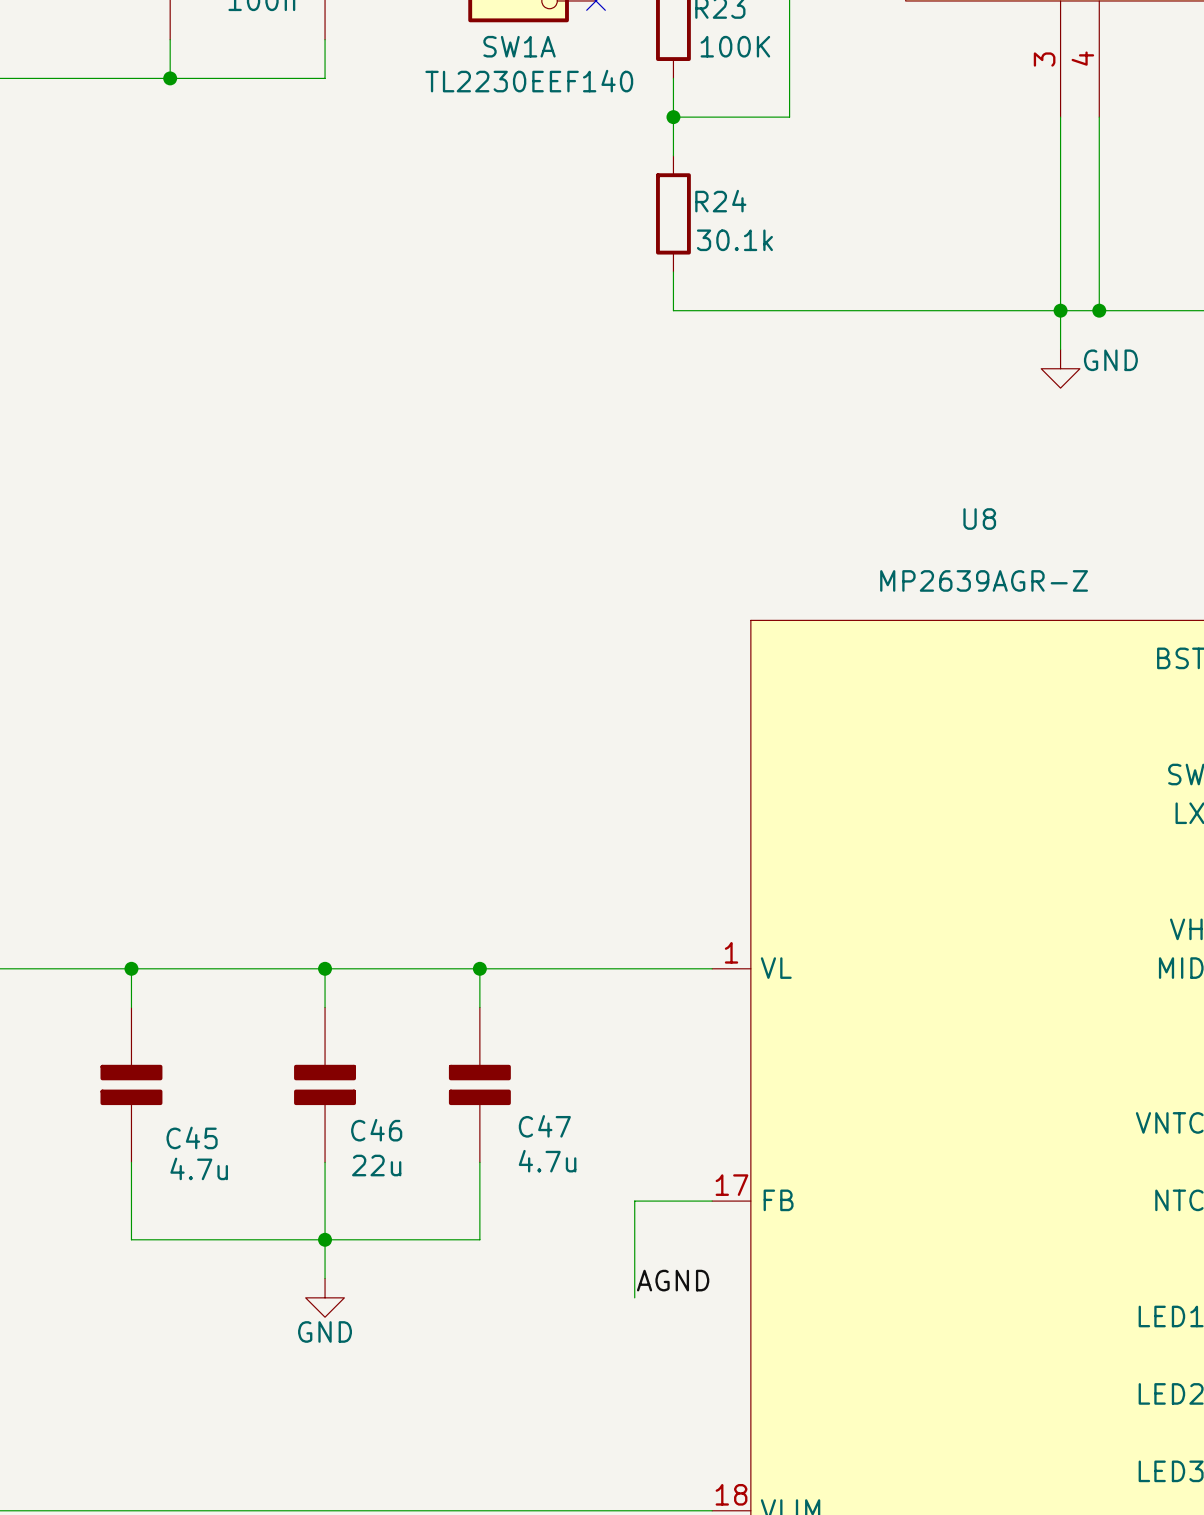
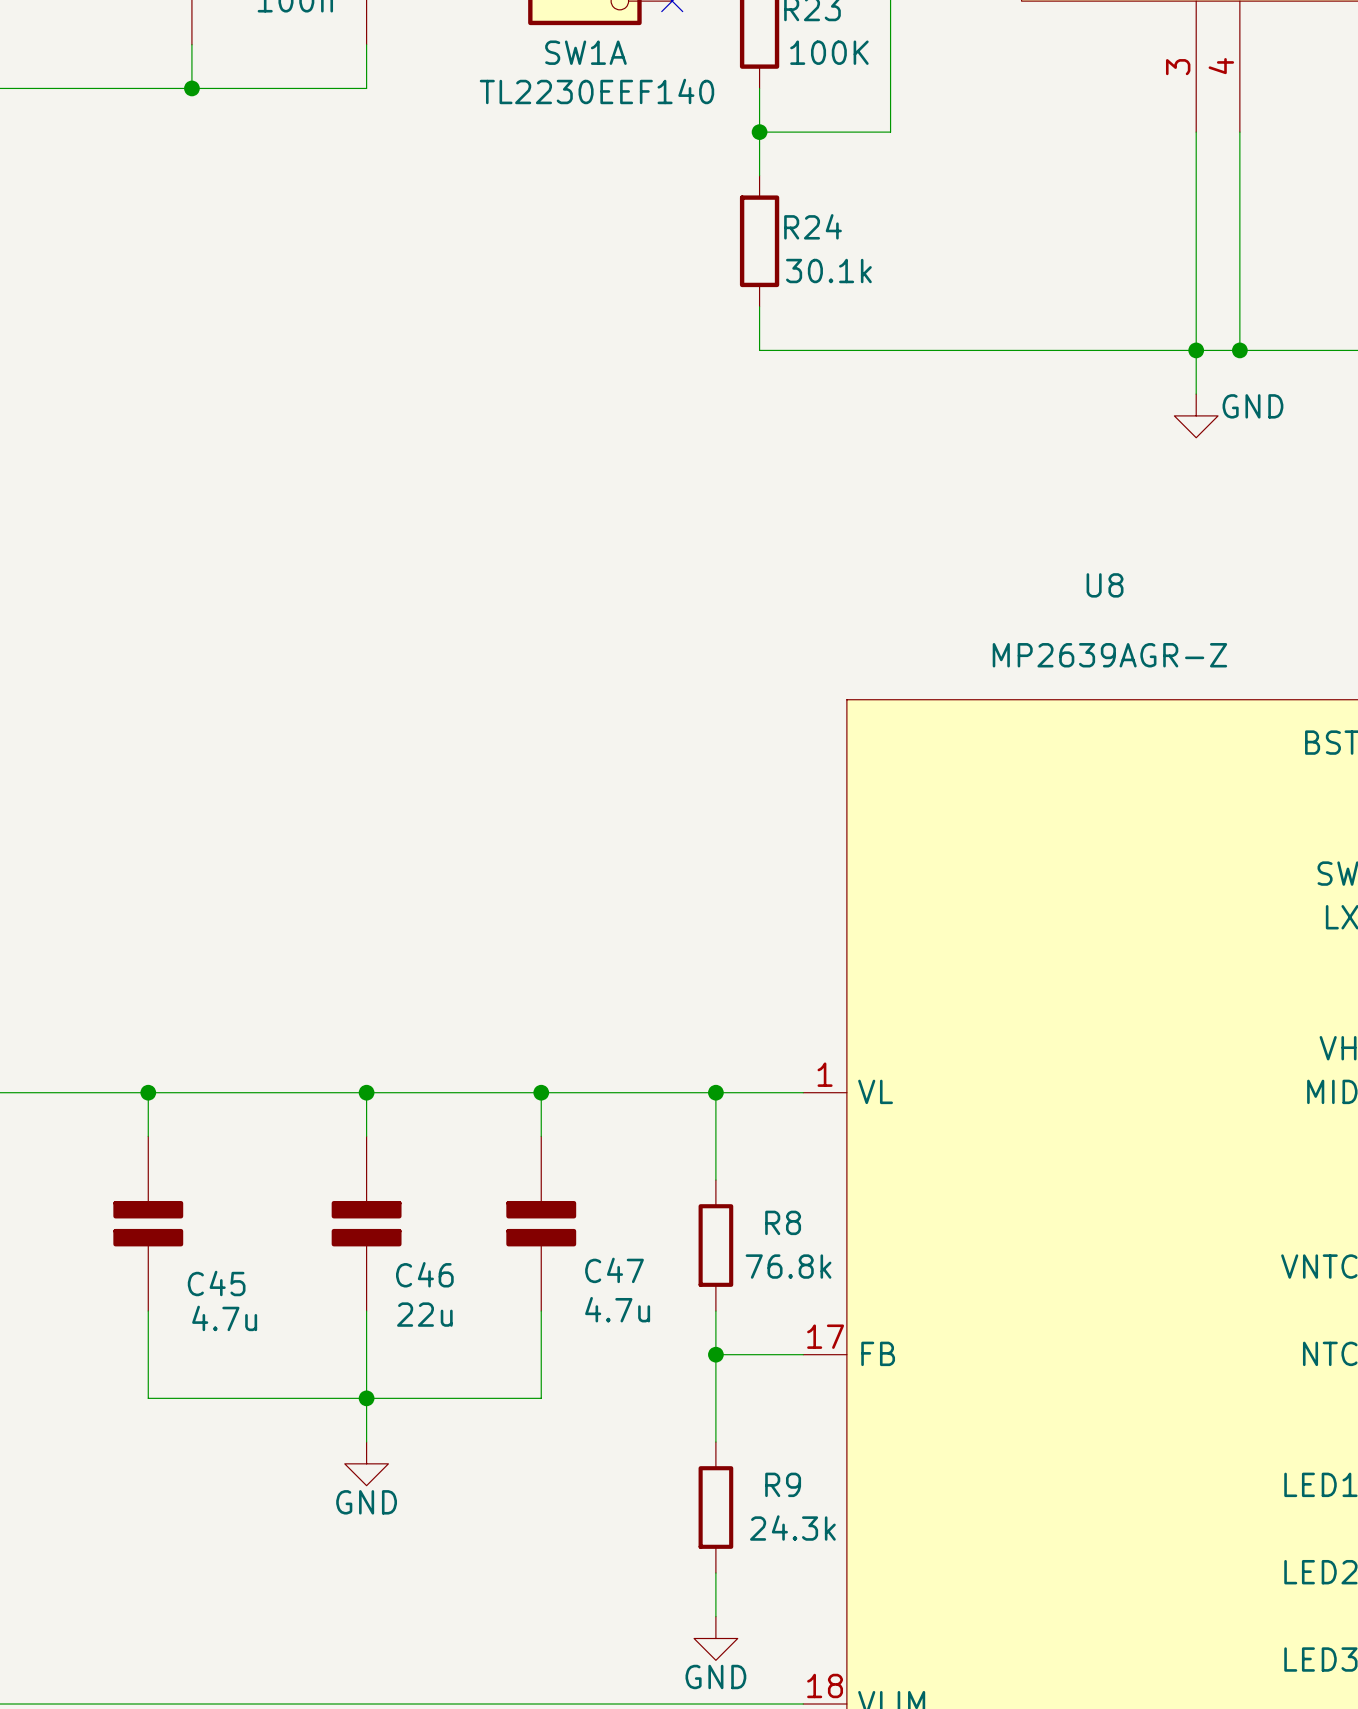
wire: none -> (715, 1092) (715, 1180)
junction: none -> (715, 1092)
R8: none -> 76.8k (715, 1245)
wire: none -> (715, 1311) (715, 1354)
junction: none -> (715, 1354)
label: AGND (673, 1280) -> none
R9: none -> 24.3k (715, 1507)
wire: none -> (715, 1573) (715, 1616)
power symbol: none -> GND (715, 1638)

